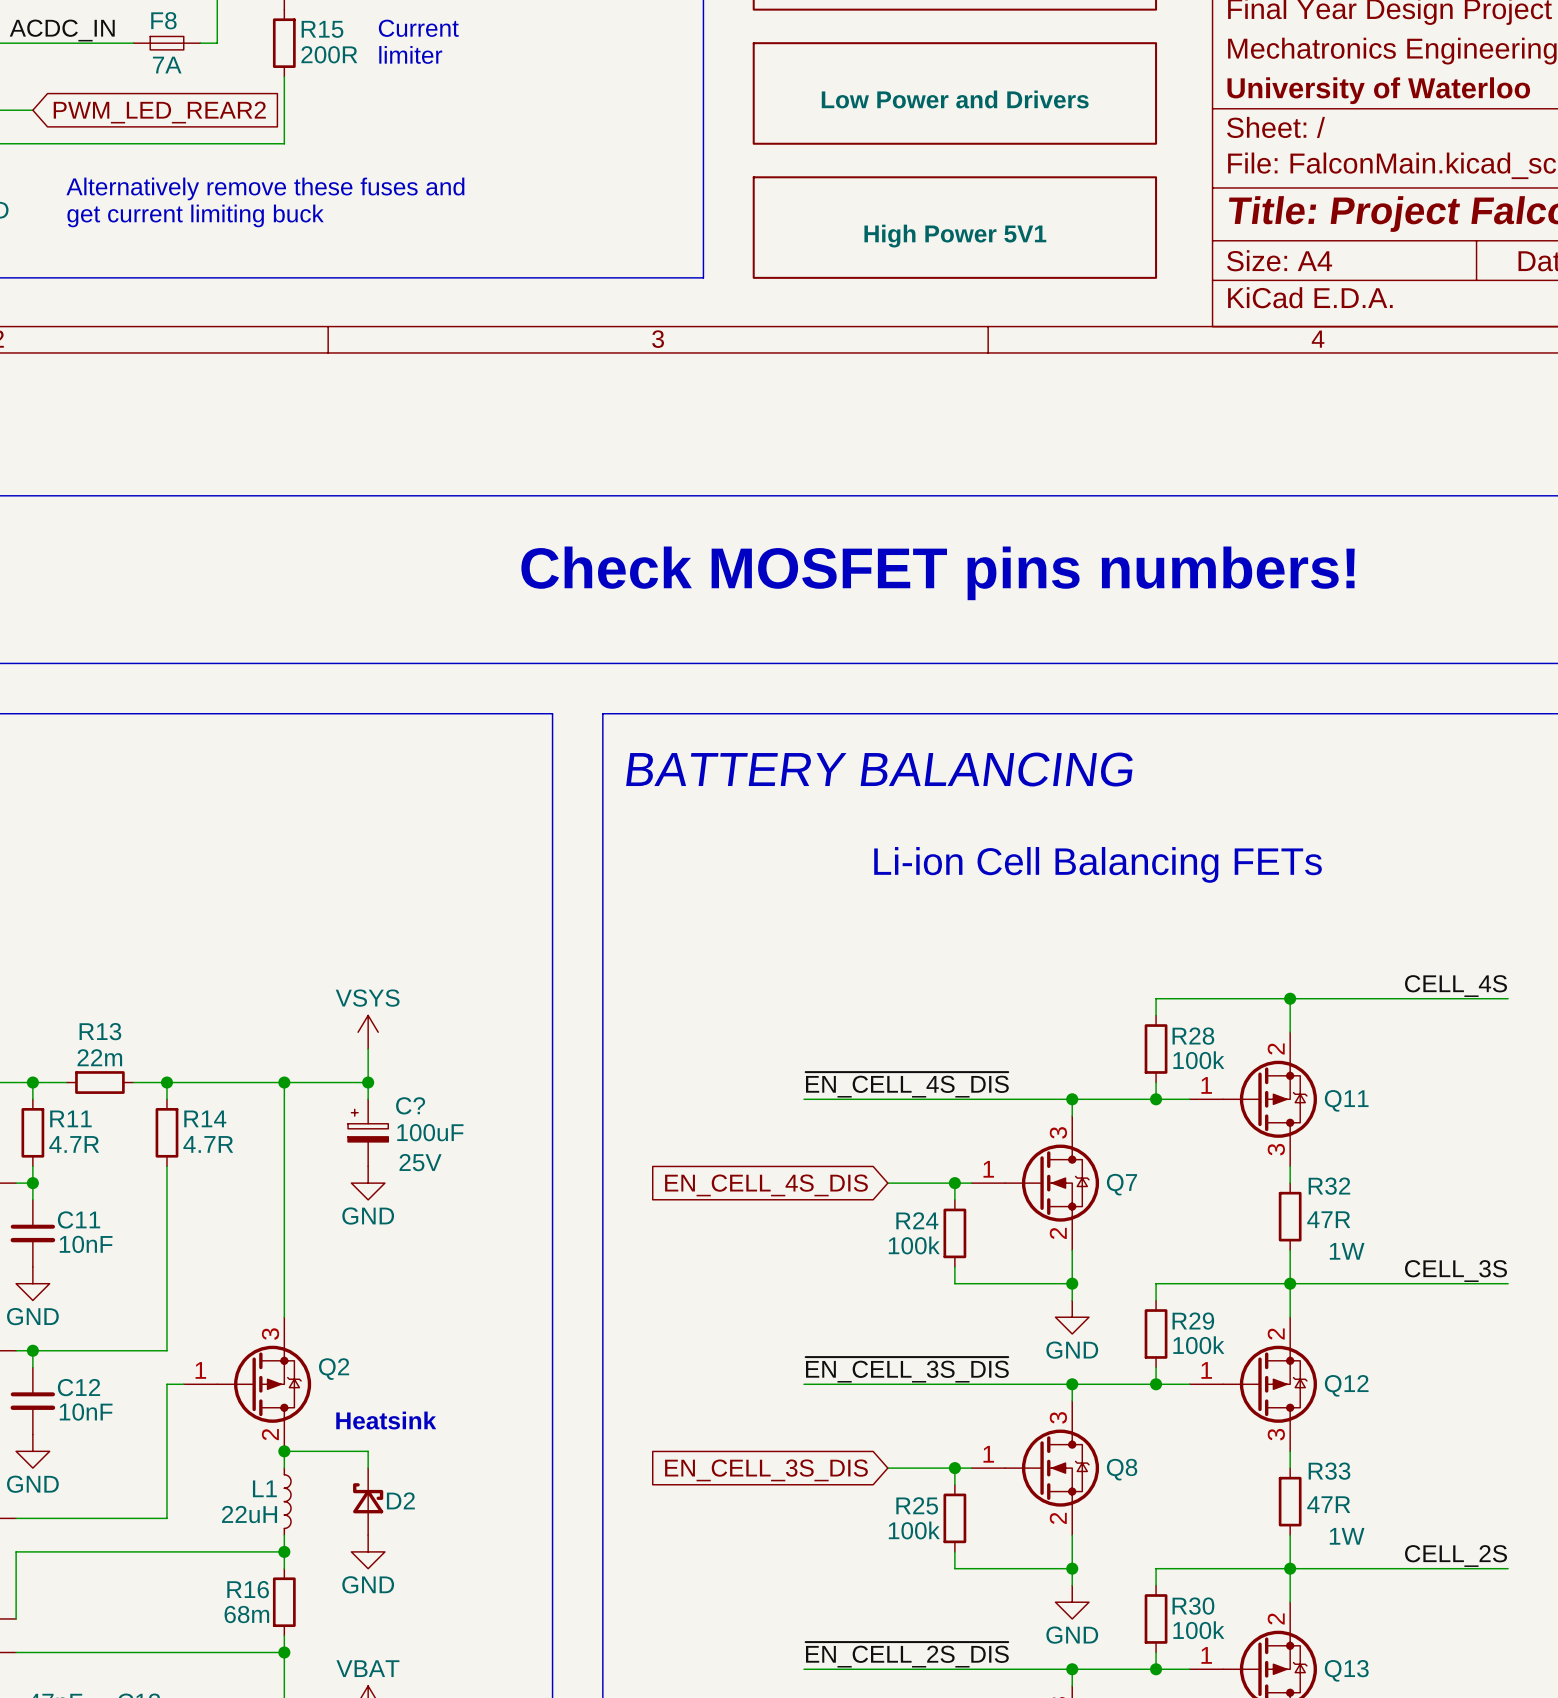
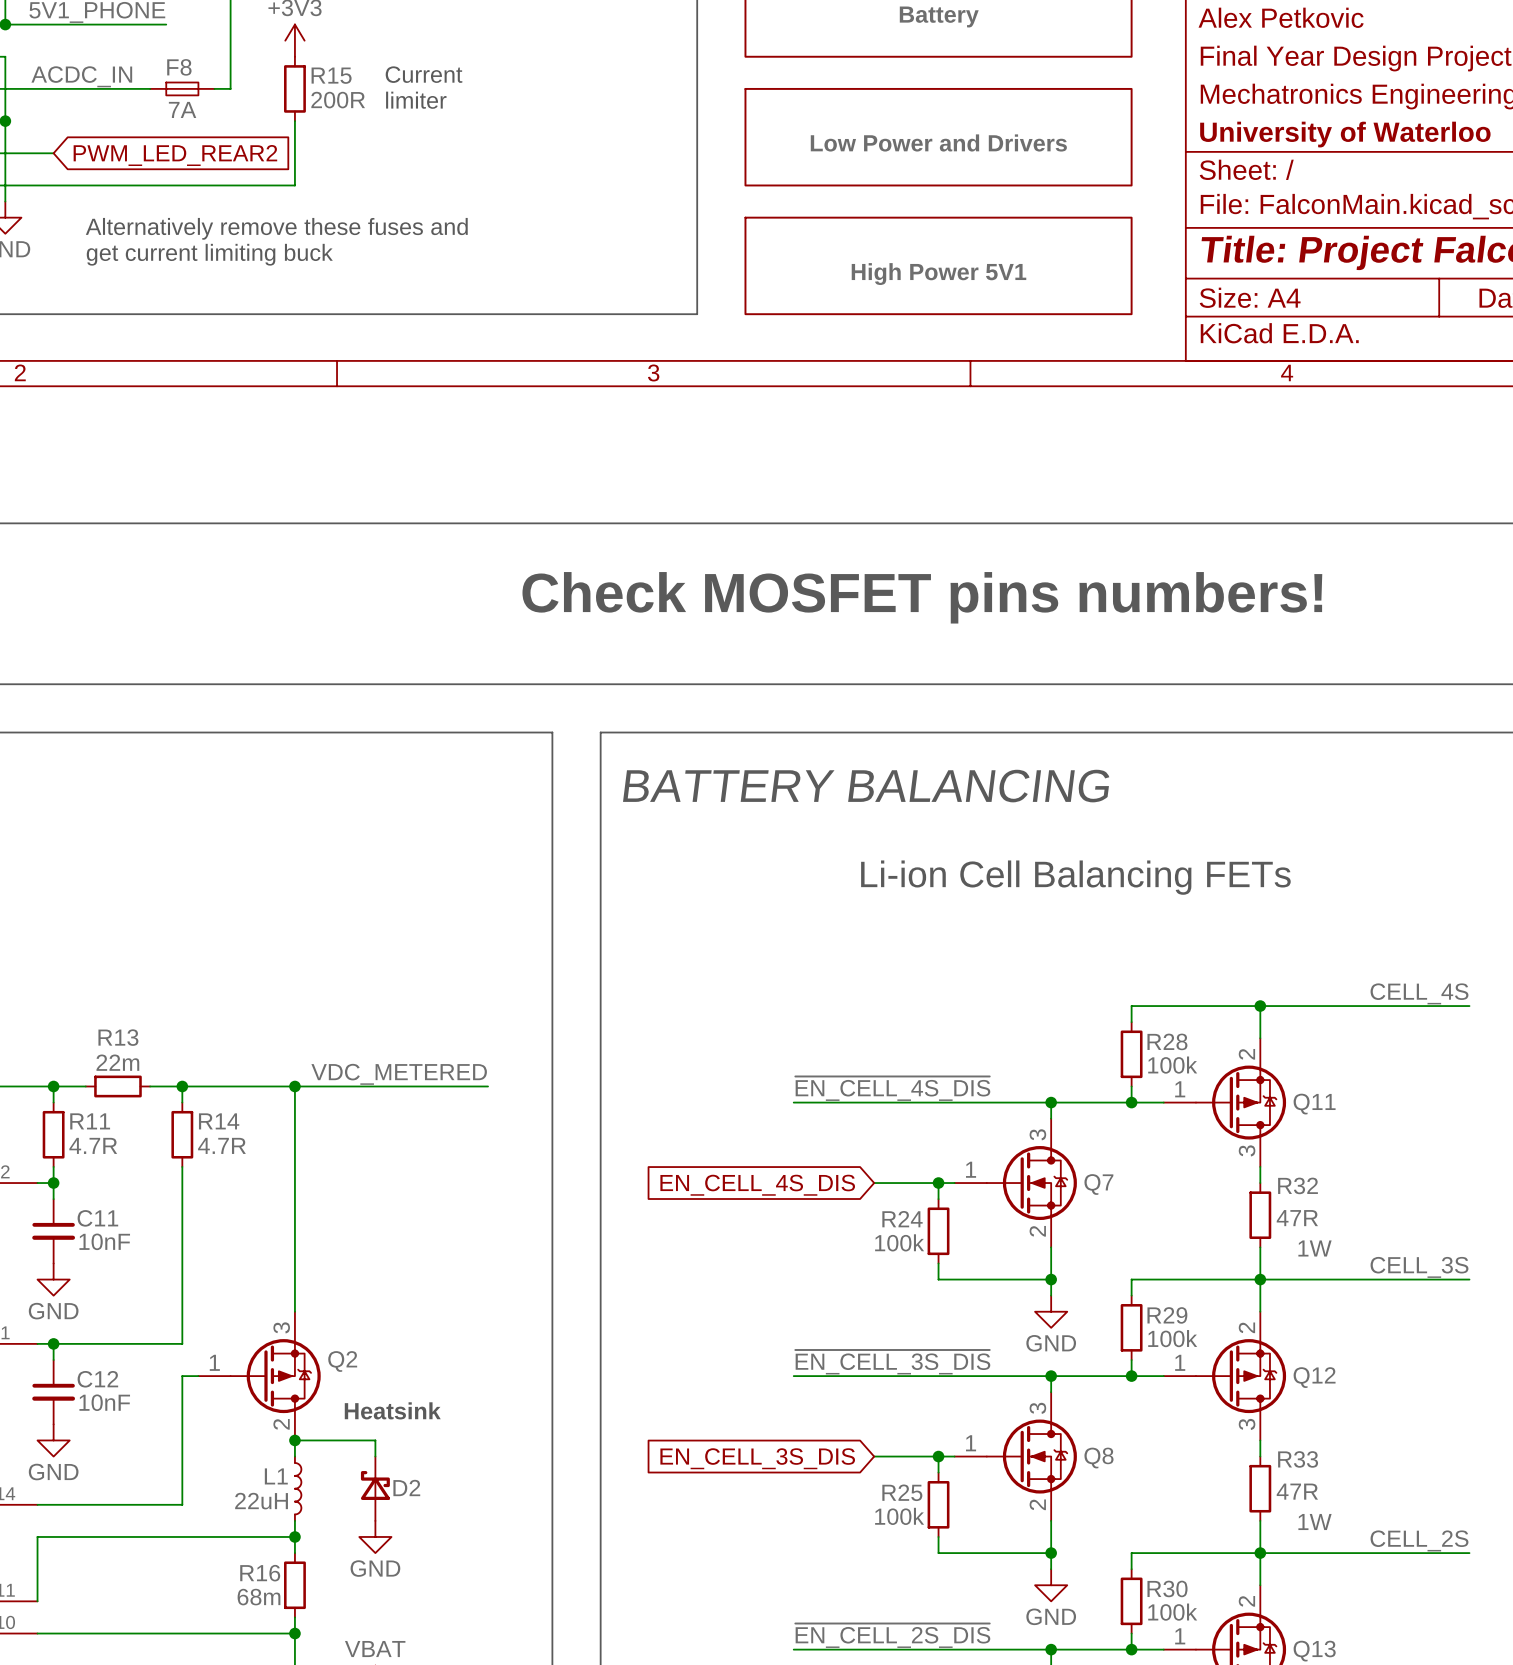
power symbol: VSYS (368, 1032) -> none
wire: (368, 1049) (368, 1099) -> none
label: none -> VDC_METERED (399, 1074)
wire: none -> (375, 1086) (488, 1086)
junction: (368, 1082) -> none
C?: 100uF (368, 1132) -> none
power symbol: GND (368, 1183) -> none

